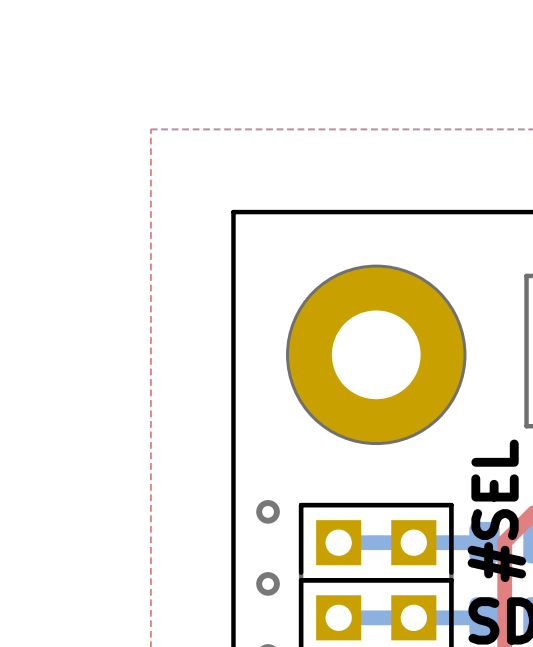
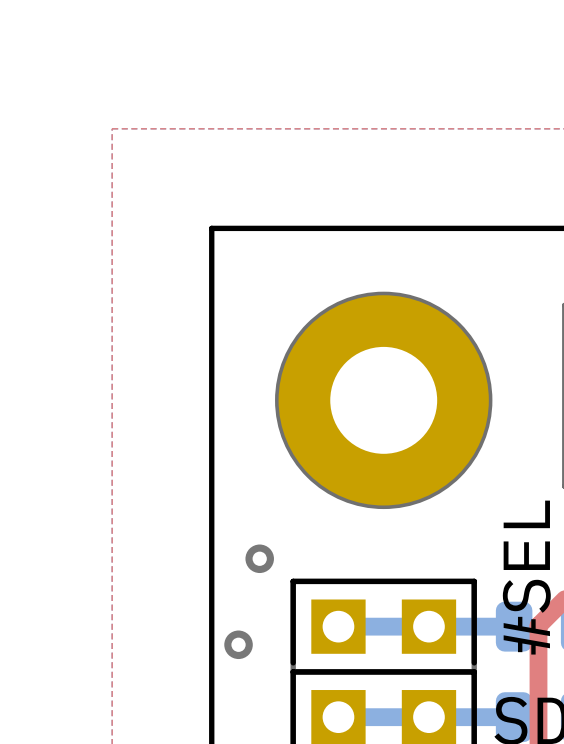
via: none -> (259, 558)
via: (268, 511) -> none
via: none -> (238, 644)
via: (268, 583) -> none

